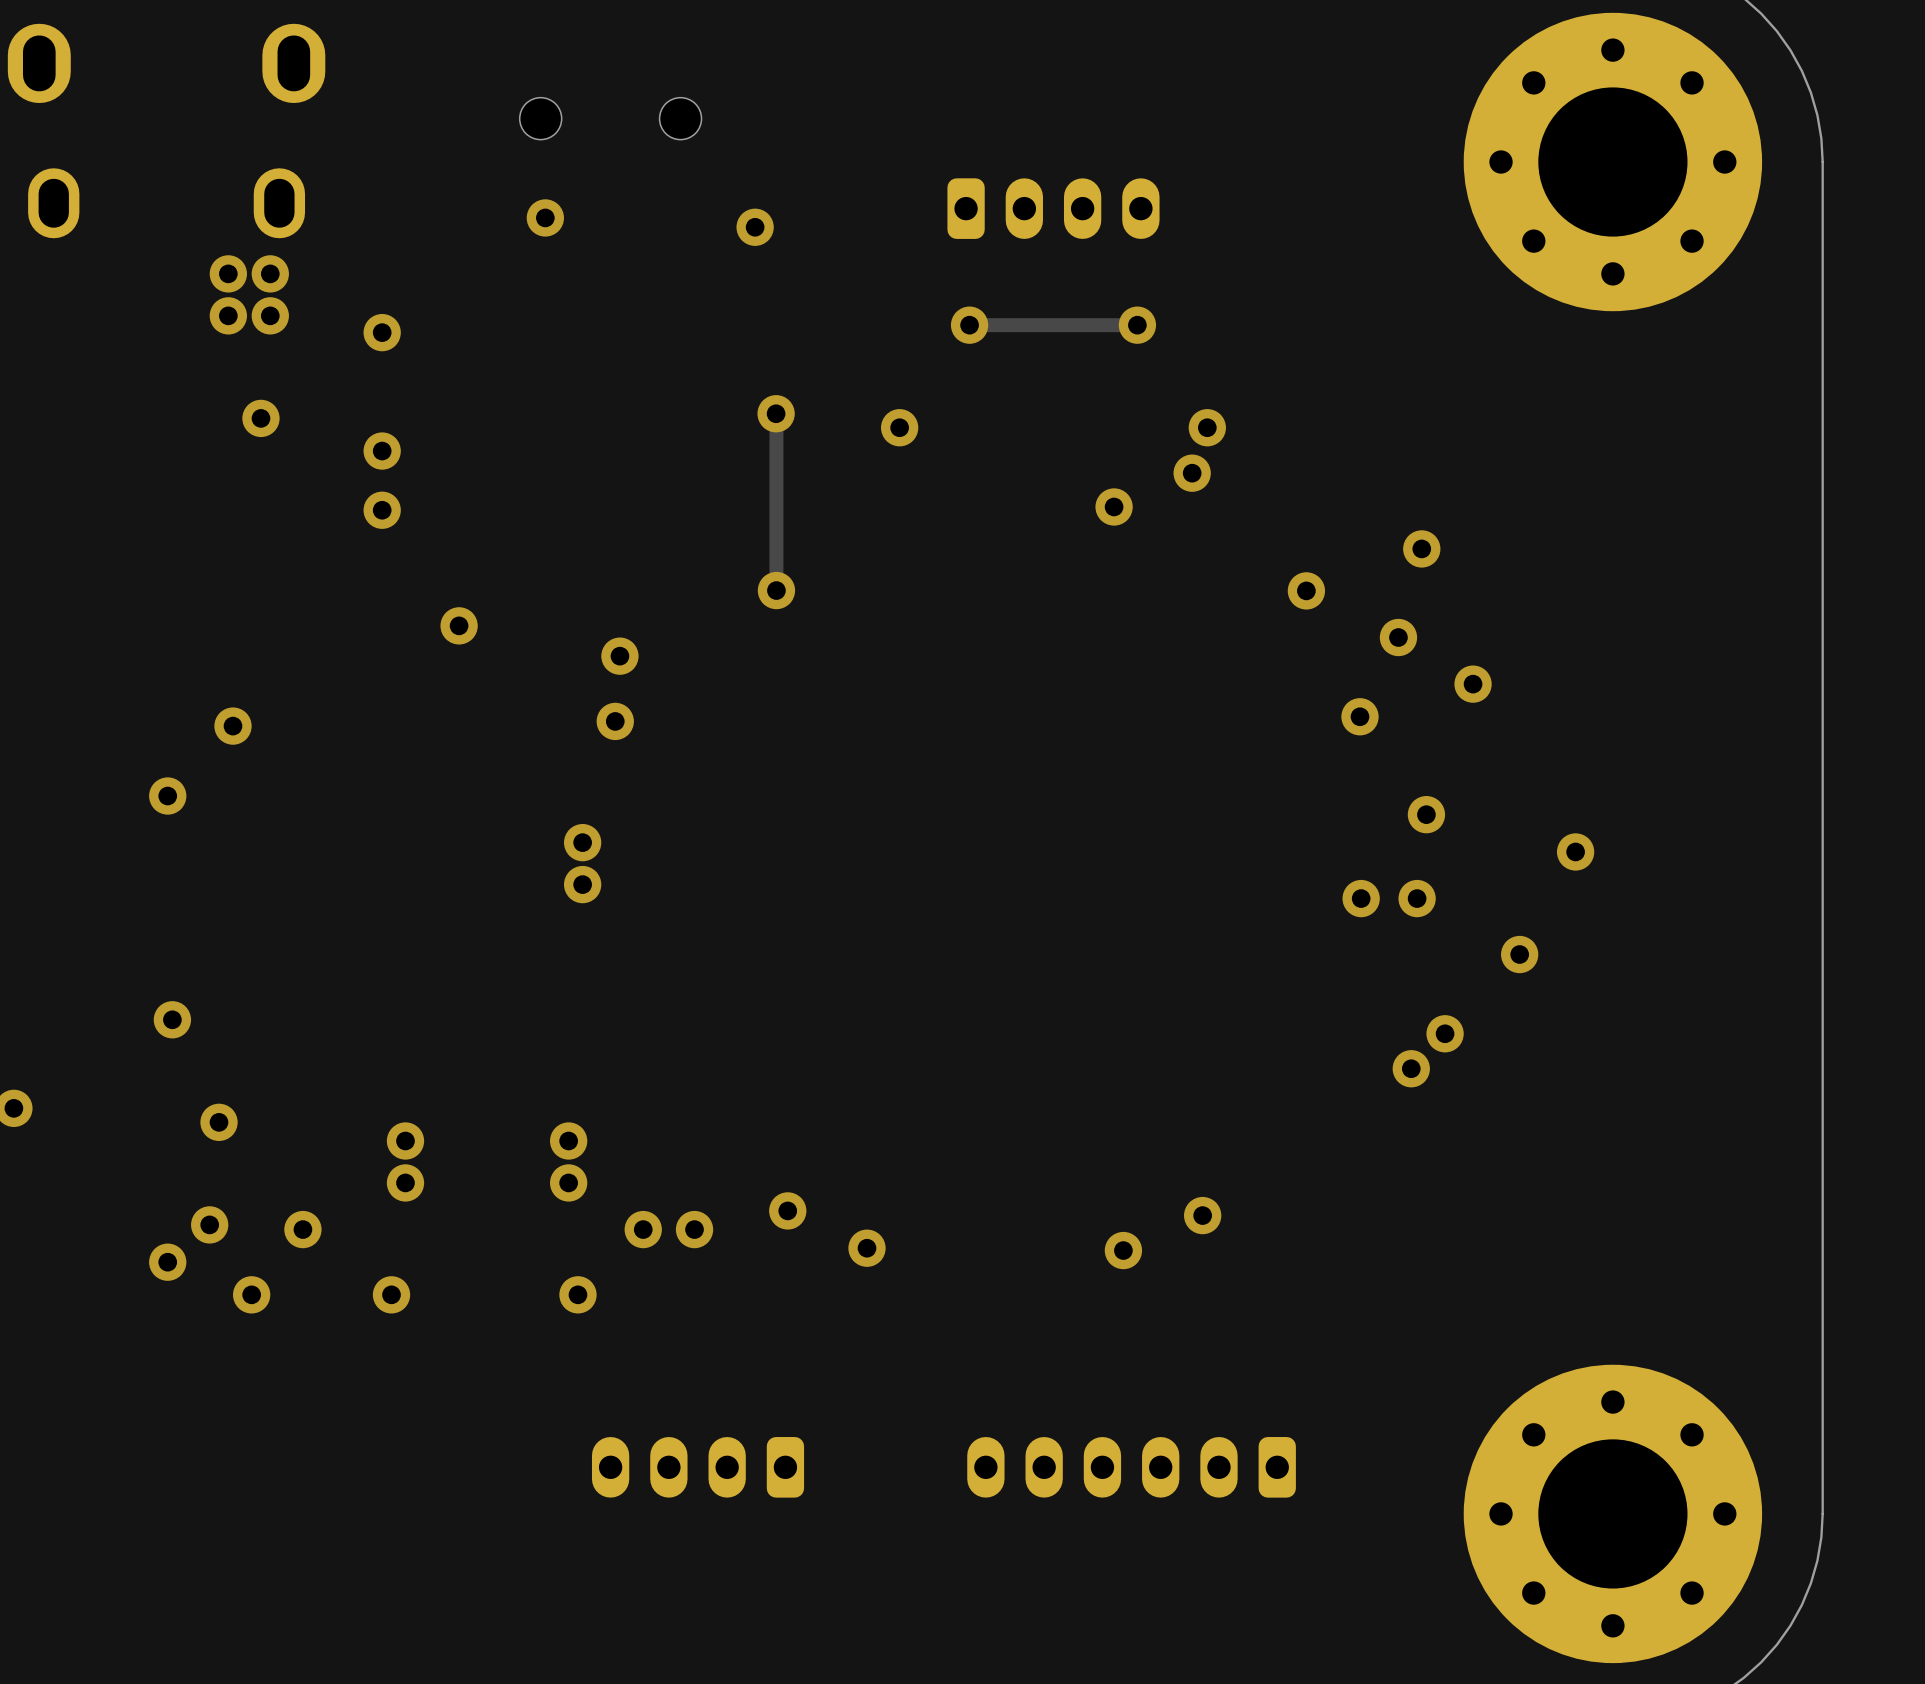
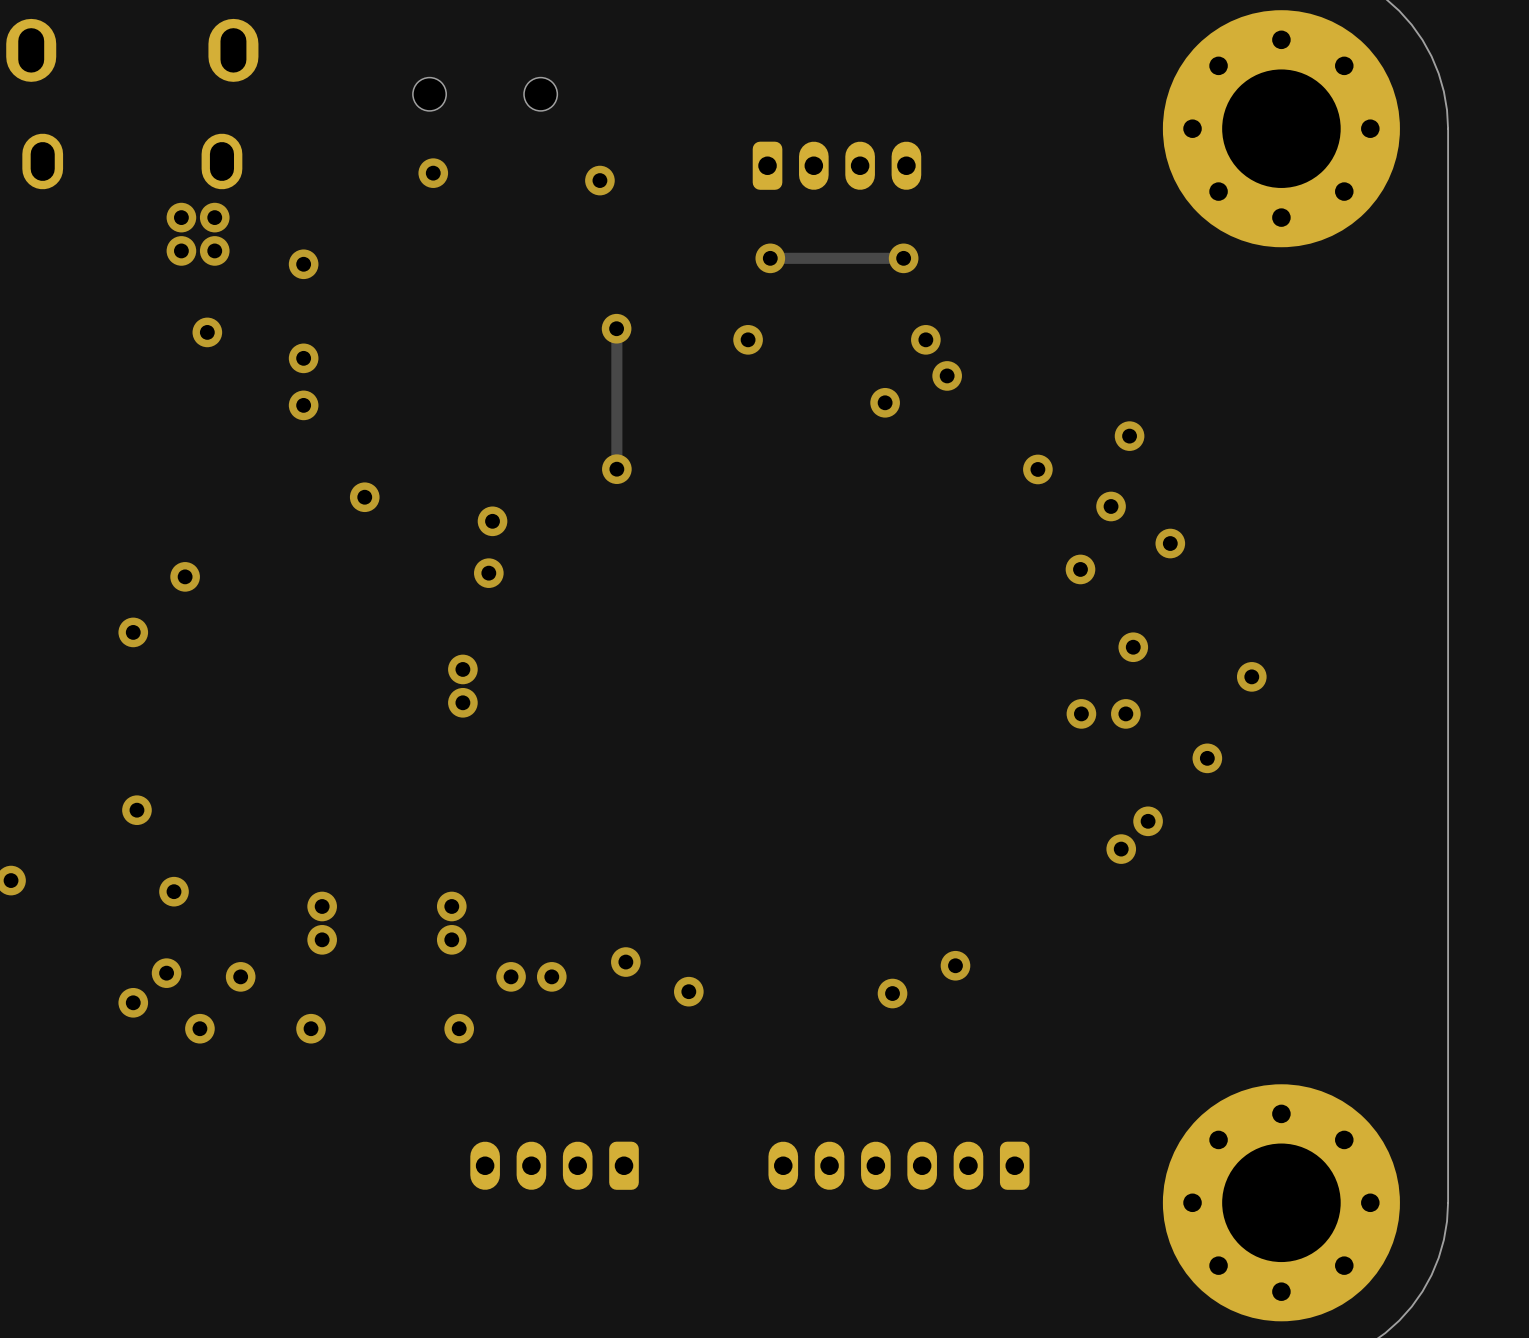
via position: (899, 427) -> (748, 339)
via position: (1207, 427) -> (925, 339)

